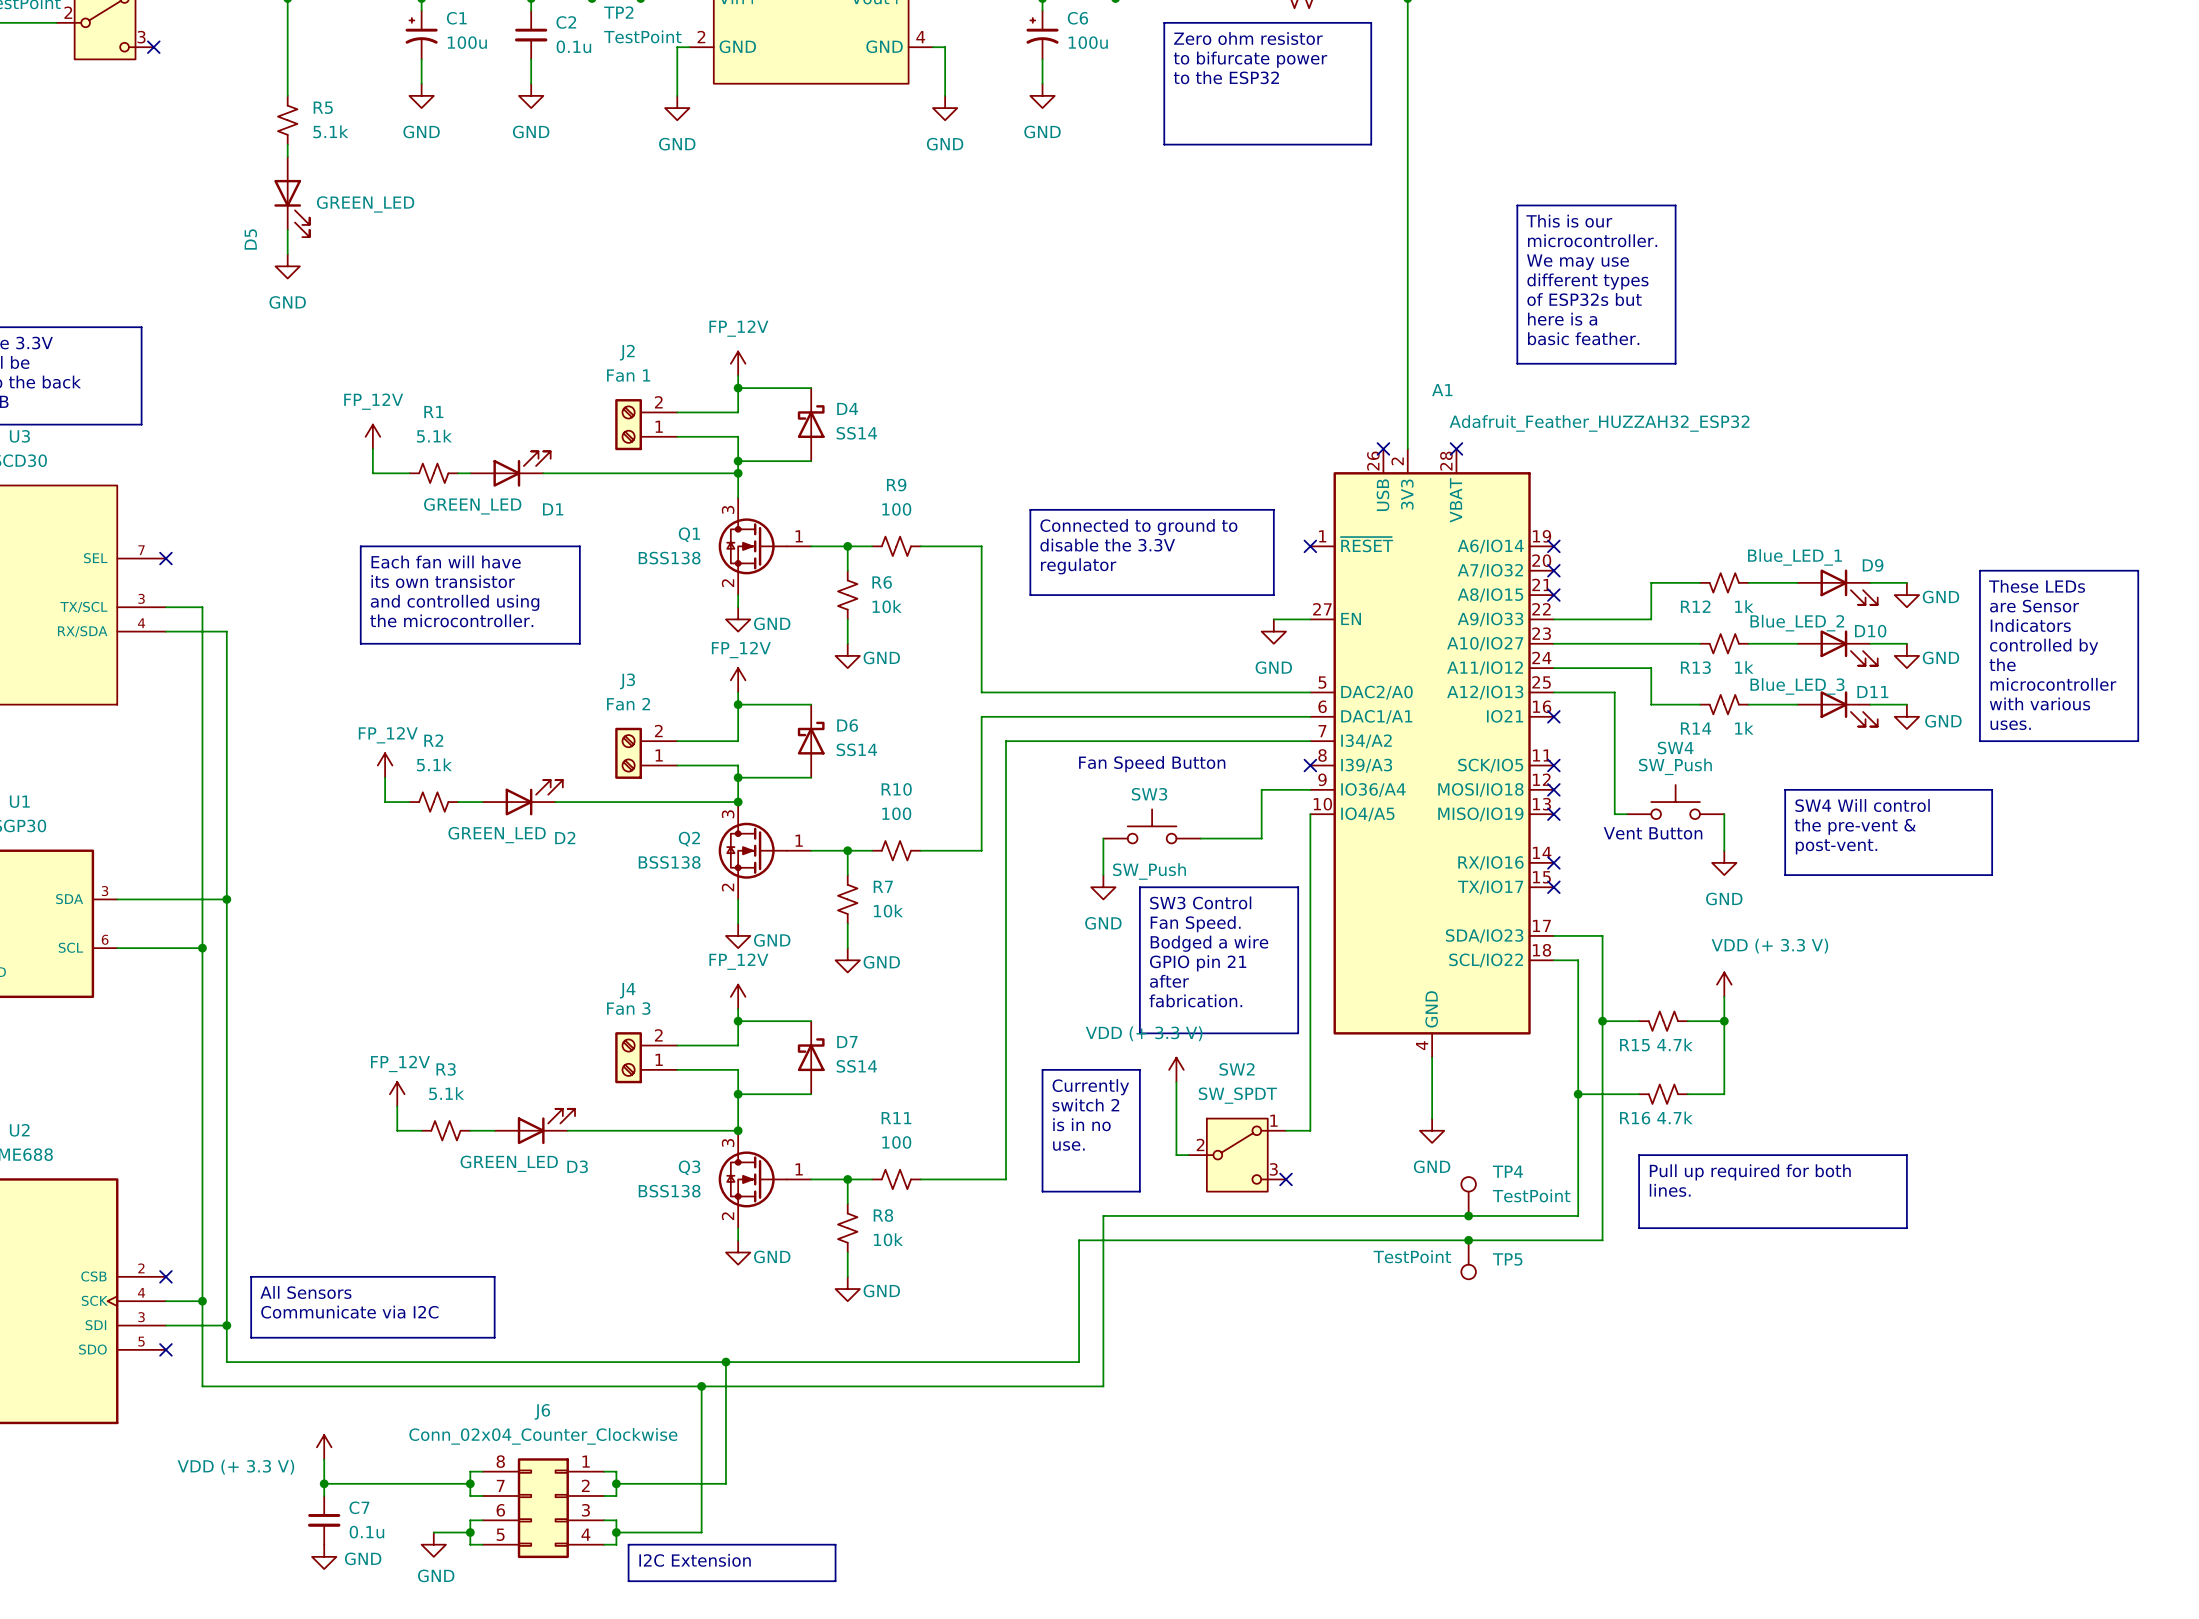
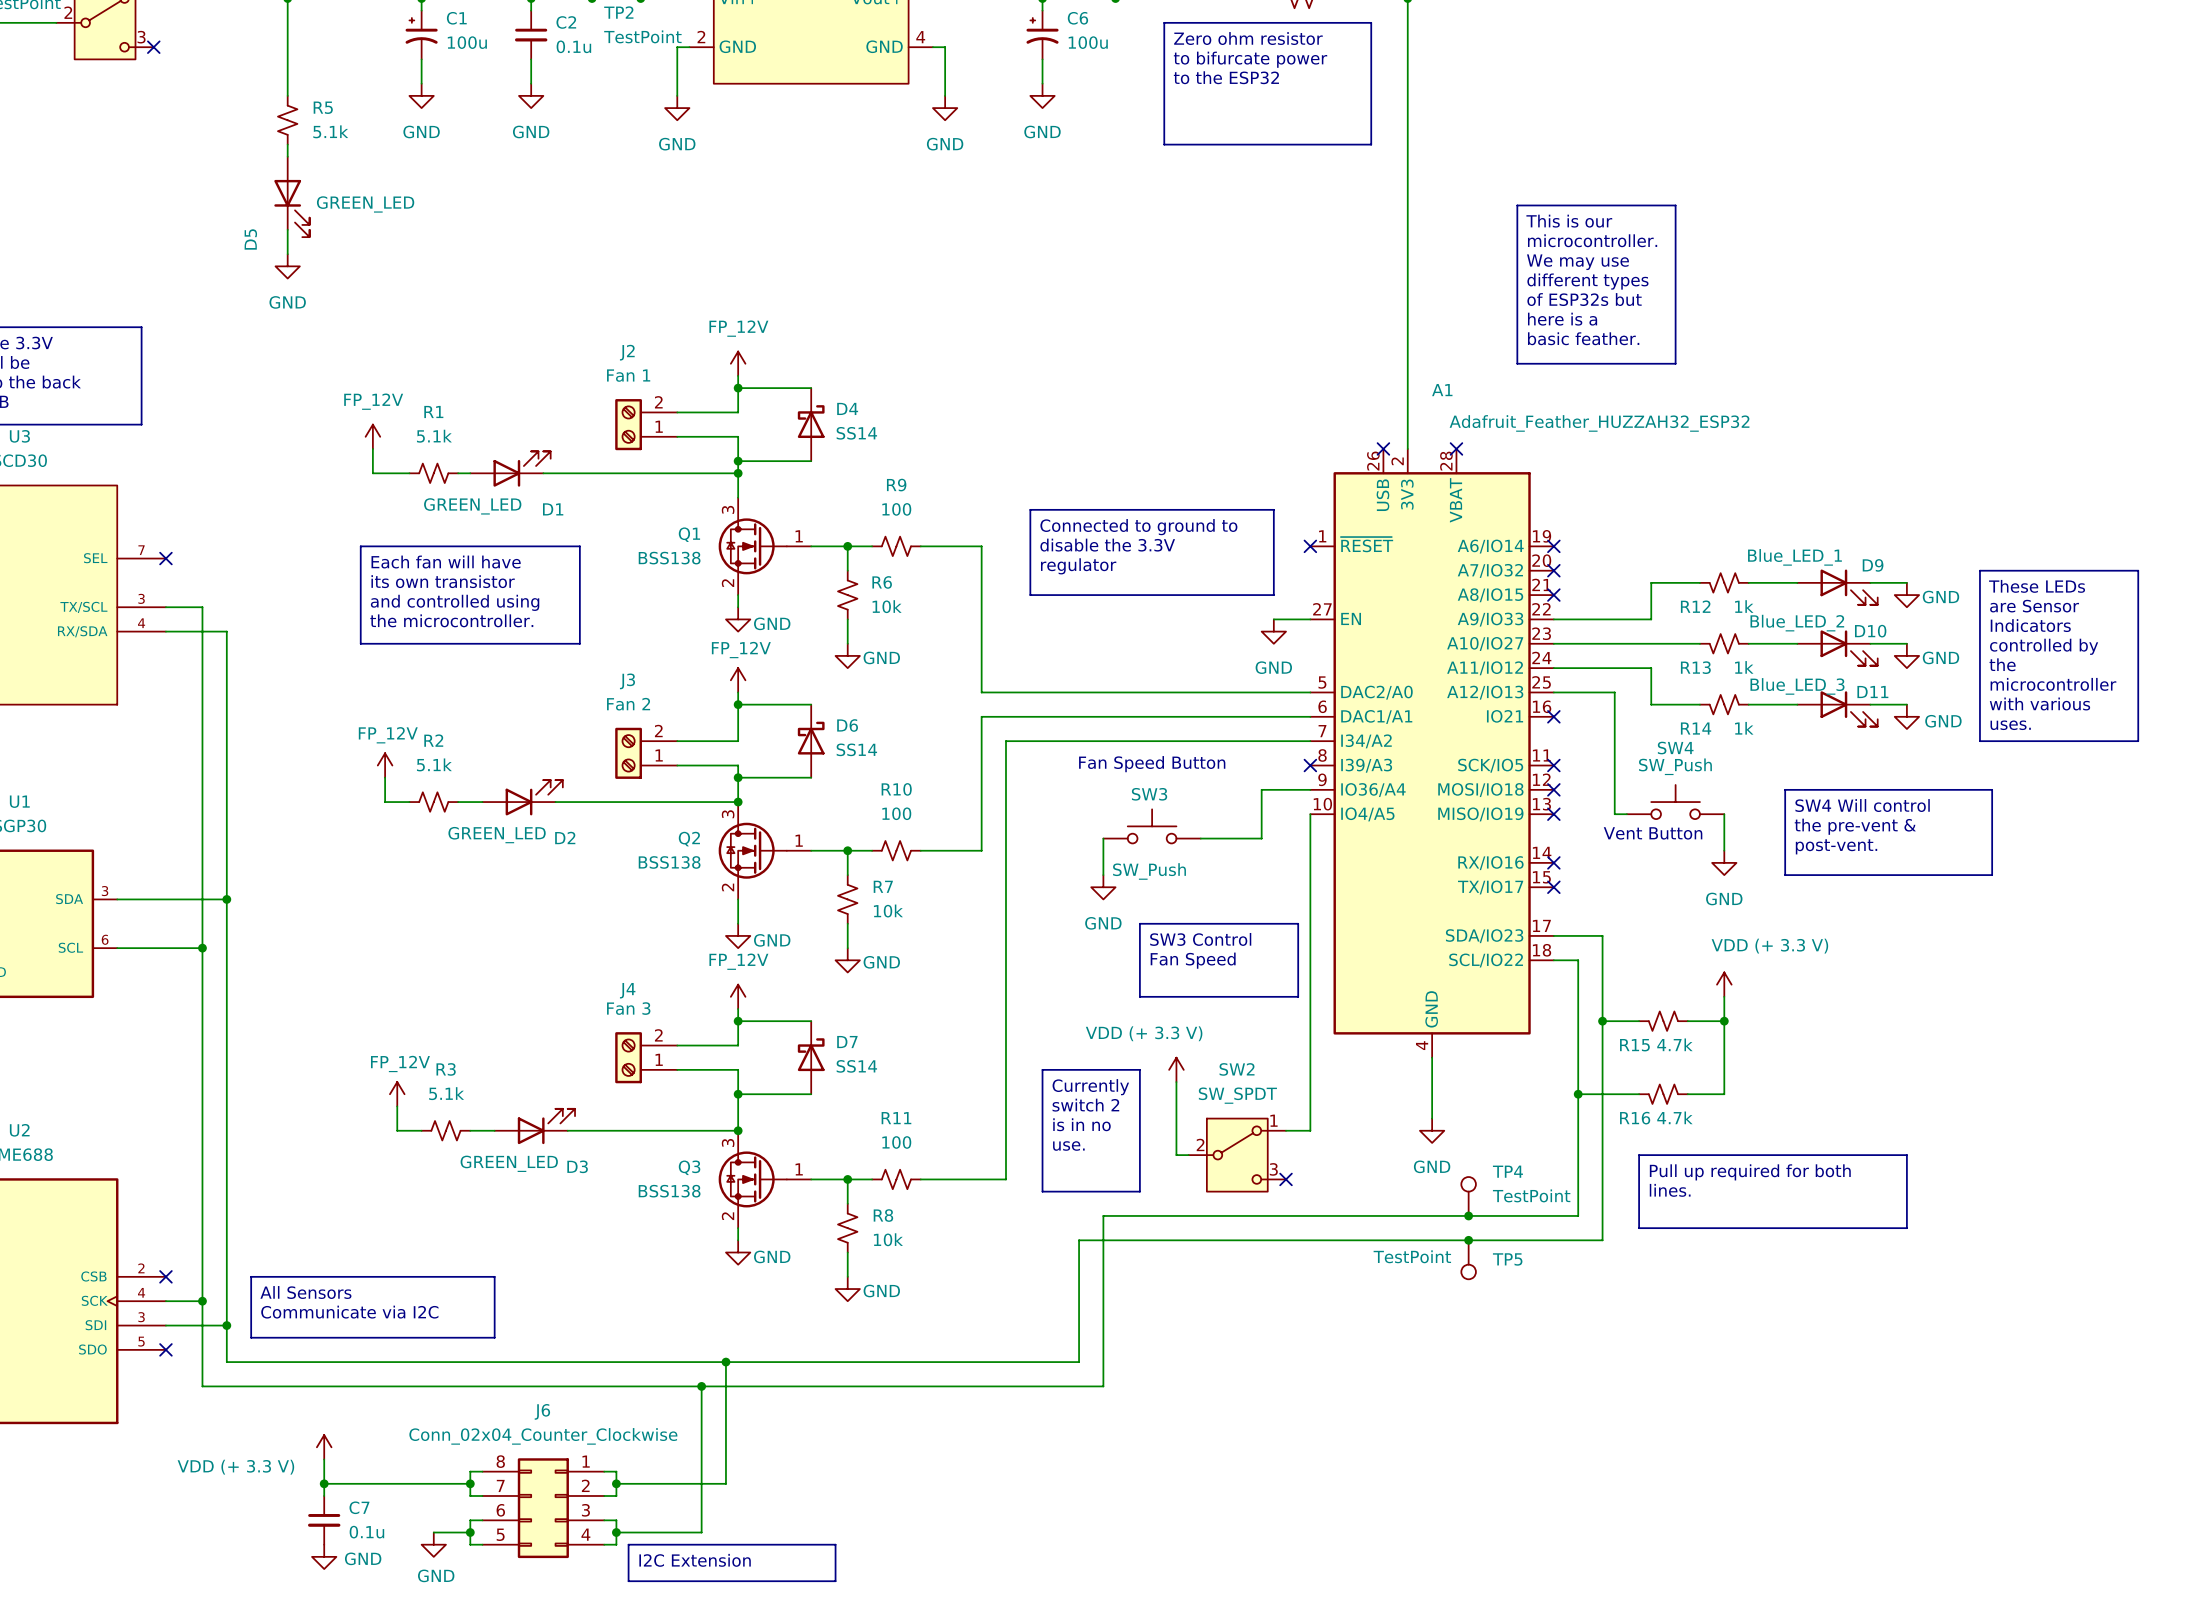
text position: SW3 Control (1200, 902) -> SW3 Control (1200, 939)
line: (1139, 923) (1139, 887) (1298, 887) (1298, 923) -> (1139, 923) (1298, 923)
text: Fan Speed. (1195, 924) -> none
text: Bodged a wire (1209, 943) -> none
text: GPIO pin 21 (1198, 963) -> Fan Speed (1193, 960)
text: after (1169, 981) -> none
line: (1139, 996) (1139, 1033) (1298, 1033) (1298, 996) -> (1139, 996) (1298, 996)
text: fabrication. (1195, 1000) -> none

